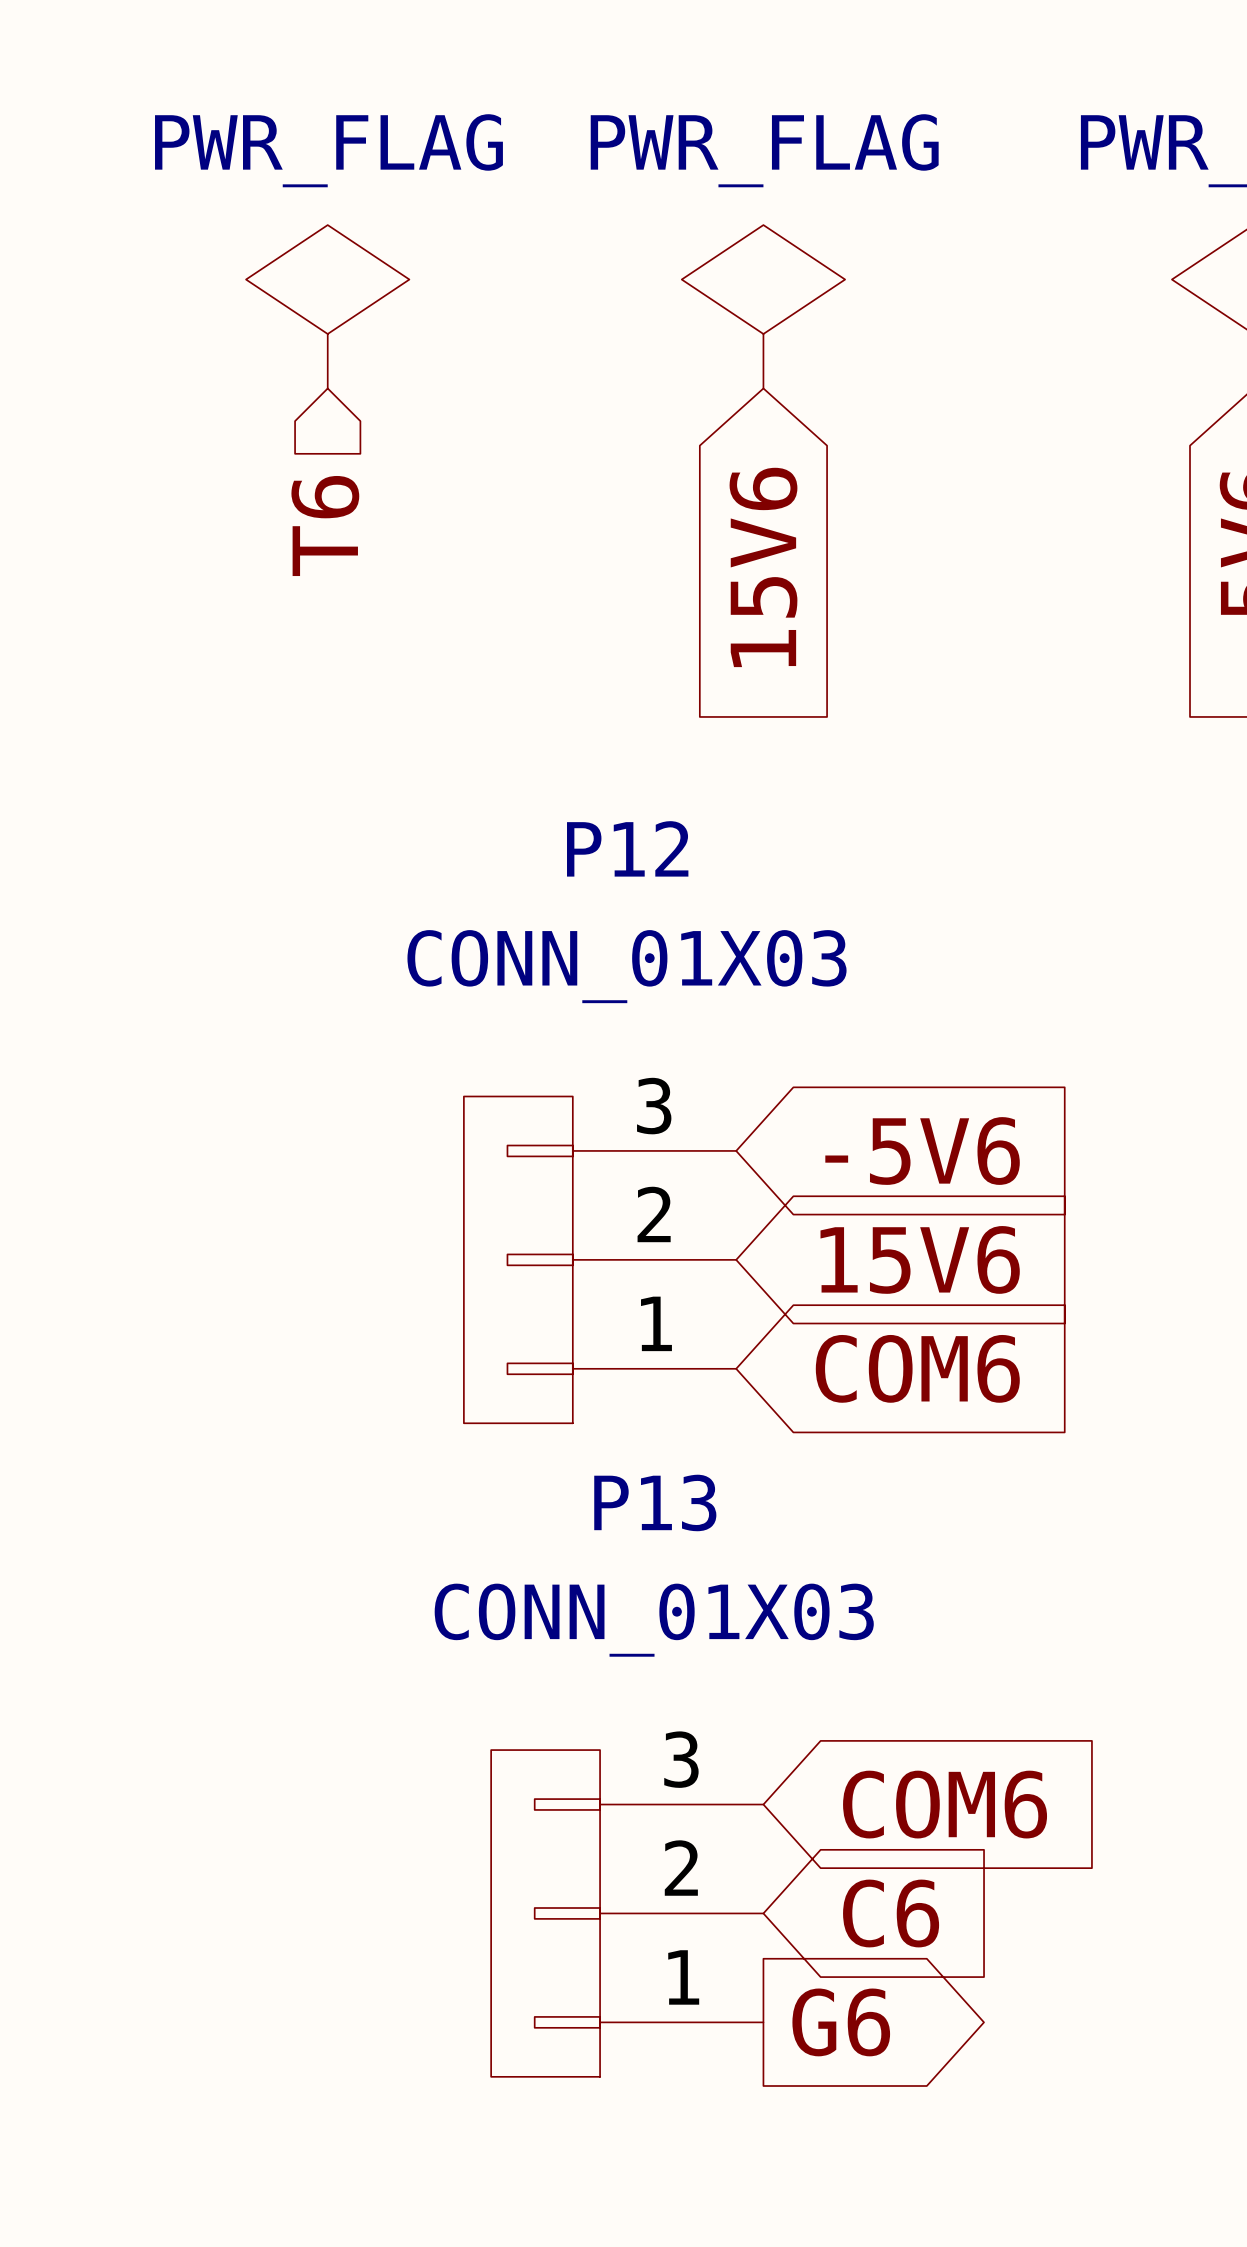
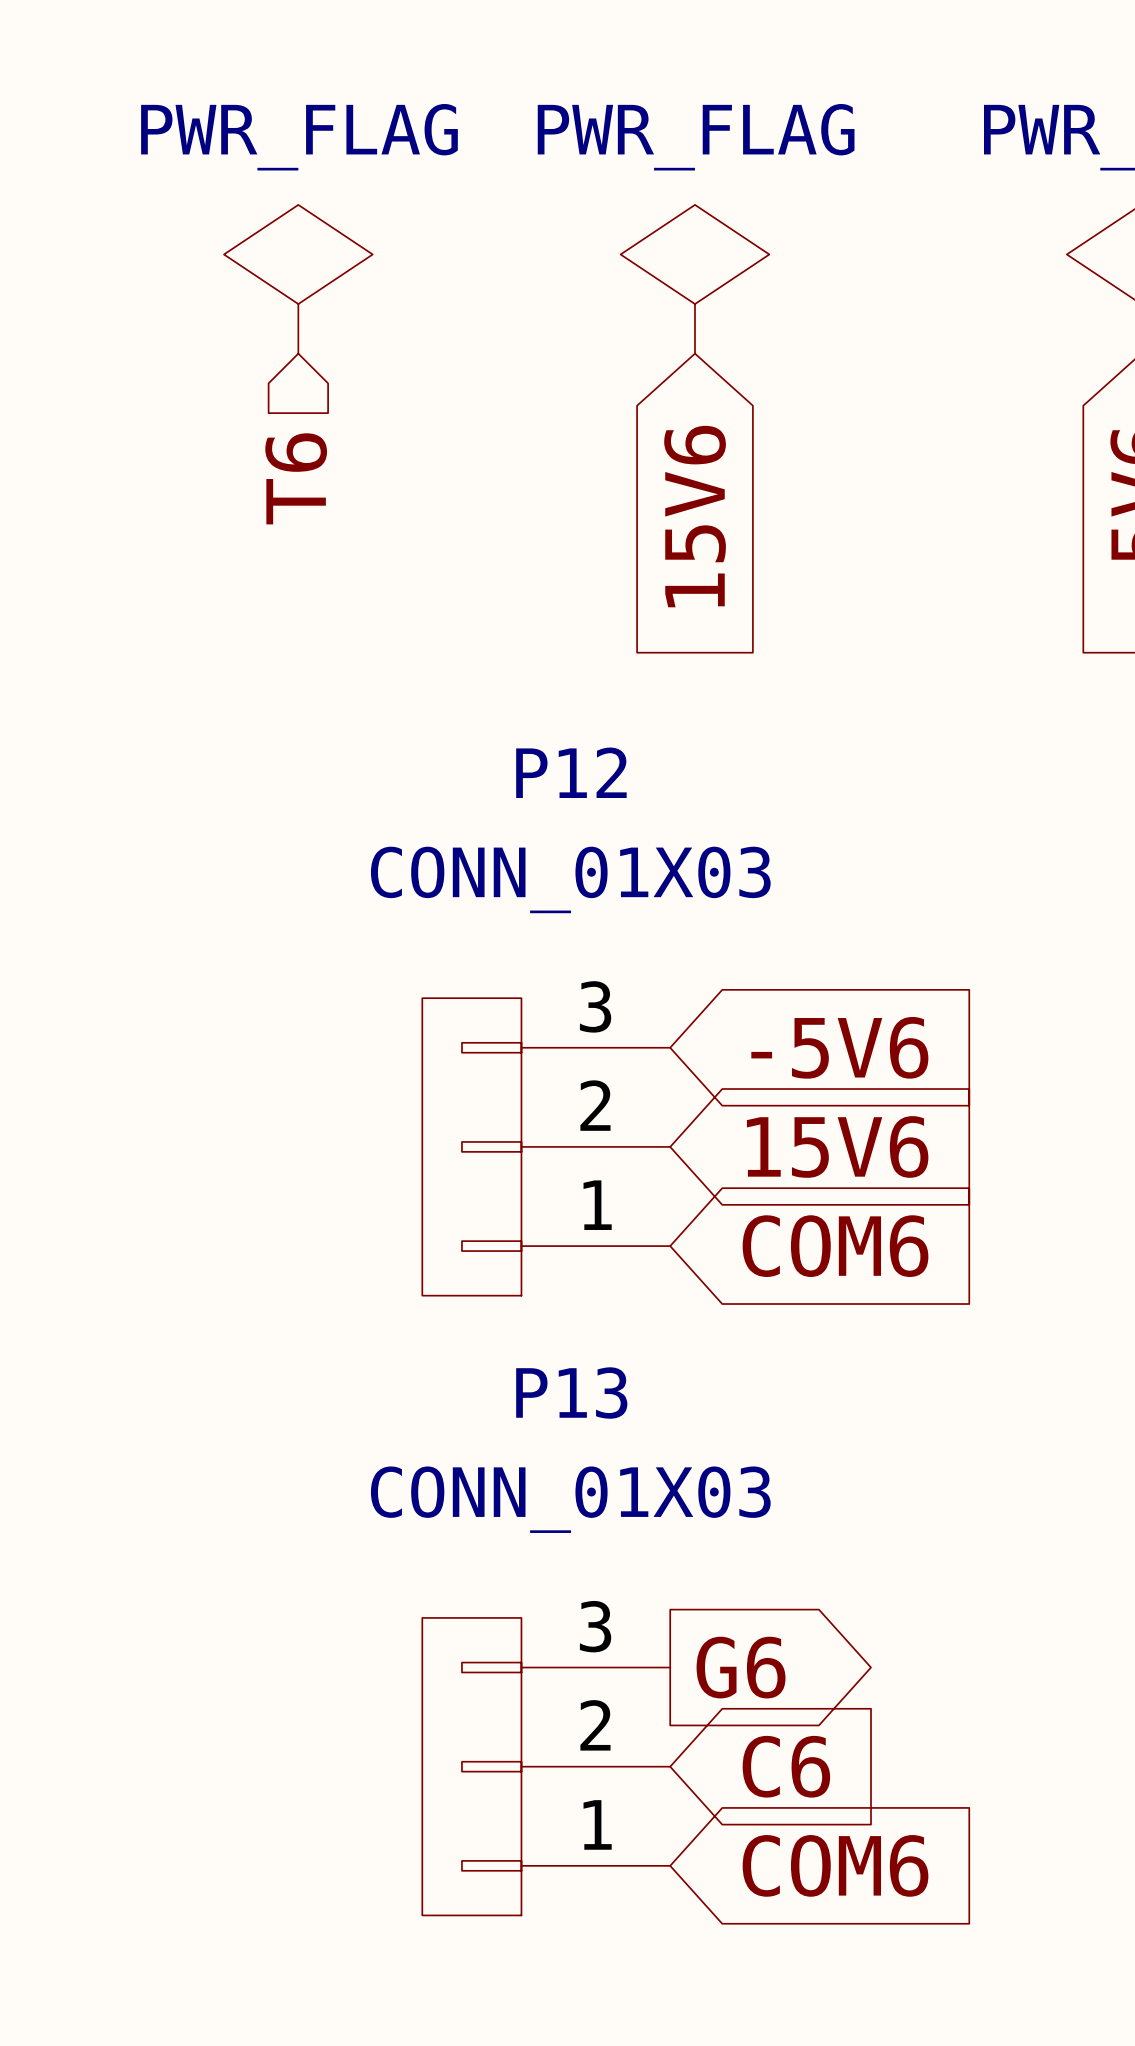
global label position: COM6 (945, 1804) -> COM6 (835, 1865)
P13 position: (627, 1913) -> (546, 1766)
global label position: C6 (891, 1913) -> C6 (786, 1766)
global label position: G6 (841, 2022) -> G6 (741, 1667)

